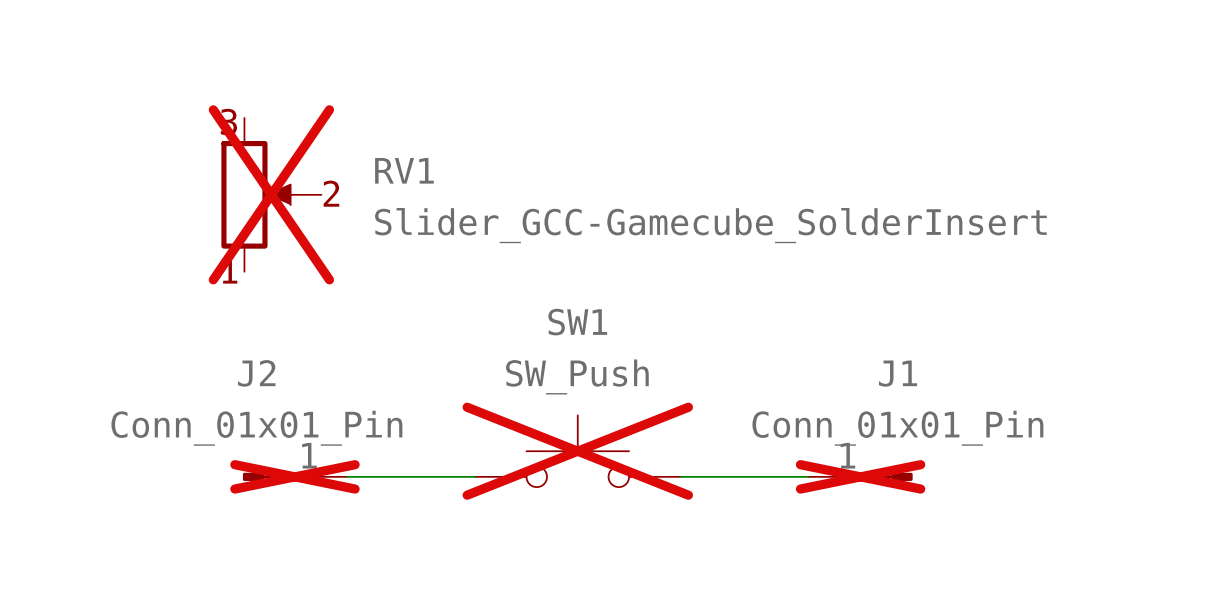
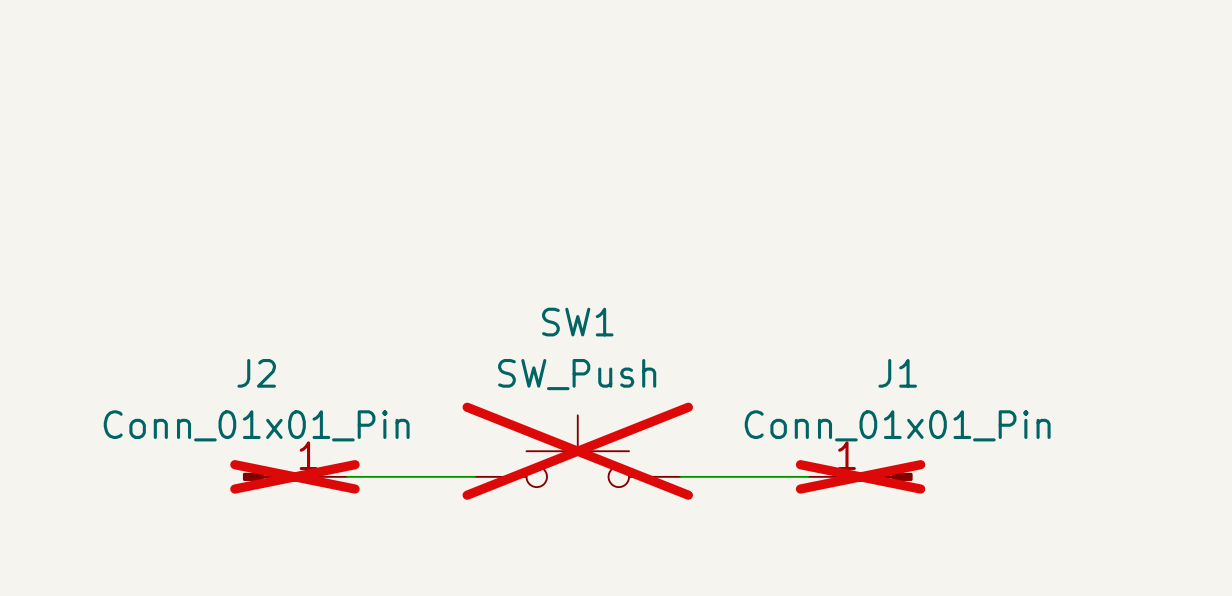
RV1: Slider_GCC-Gamecube_SolderInsert (271, 194) -> none

